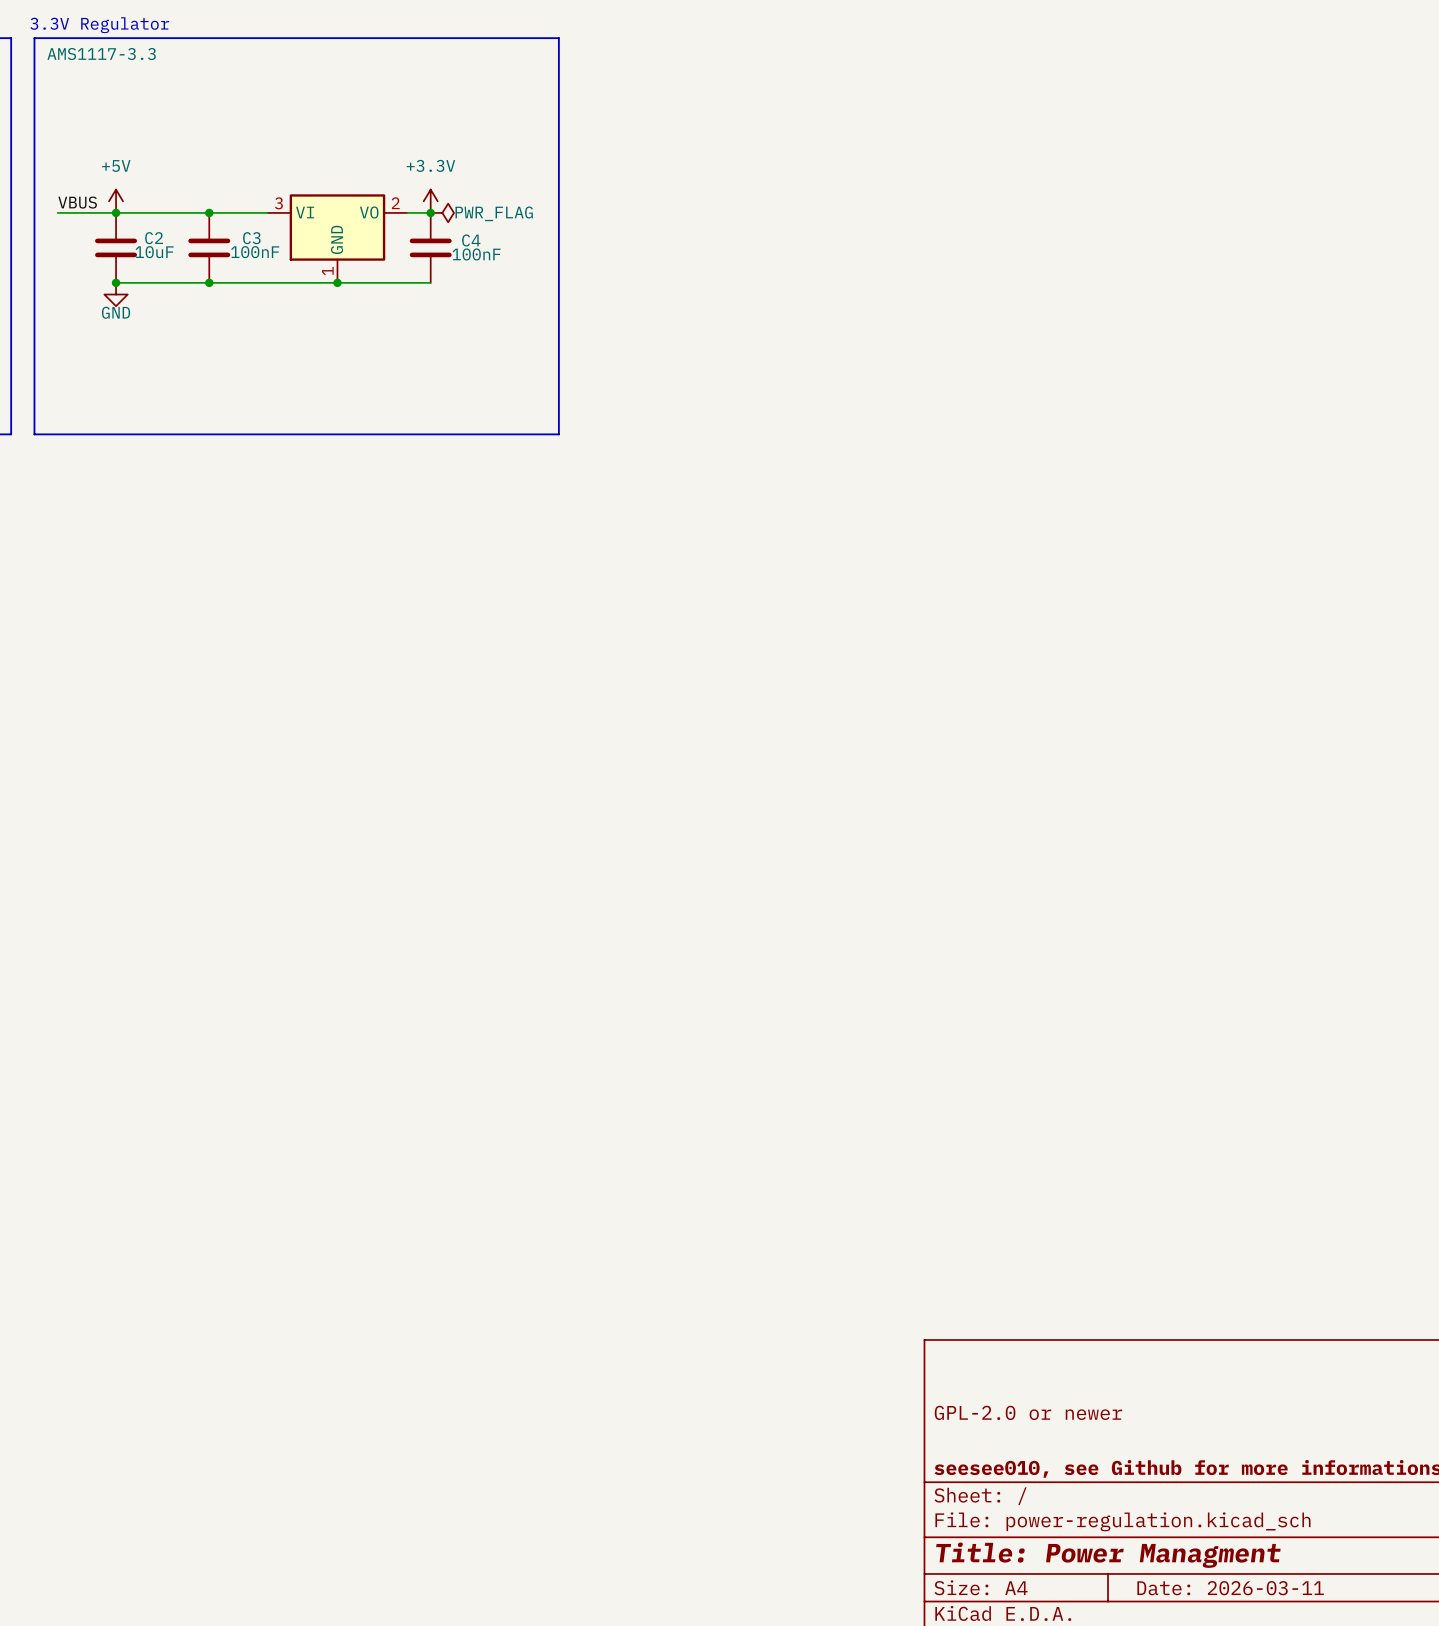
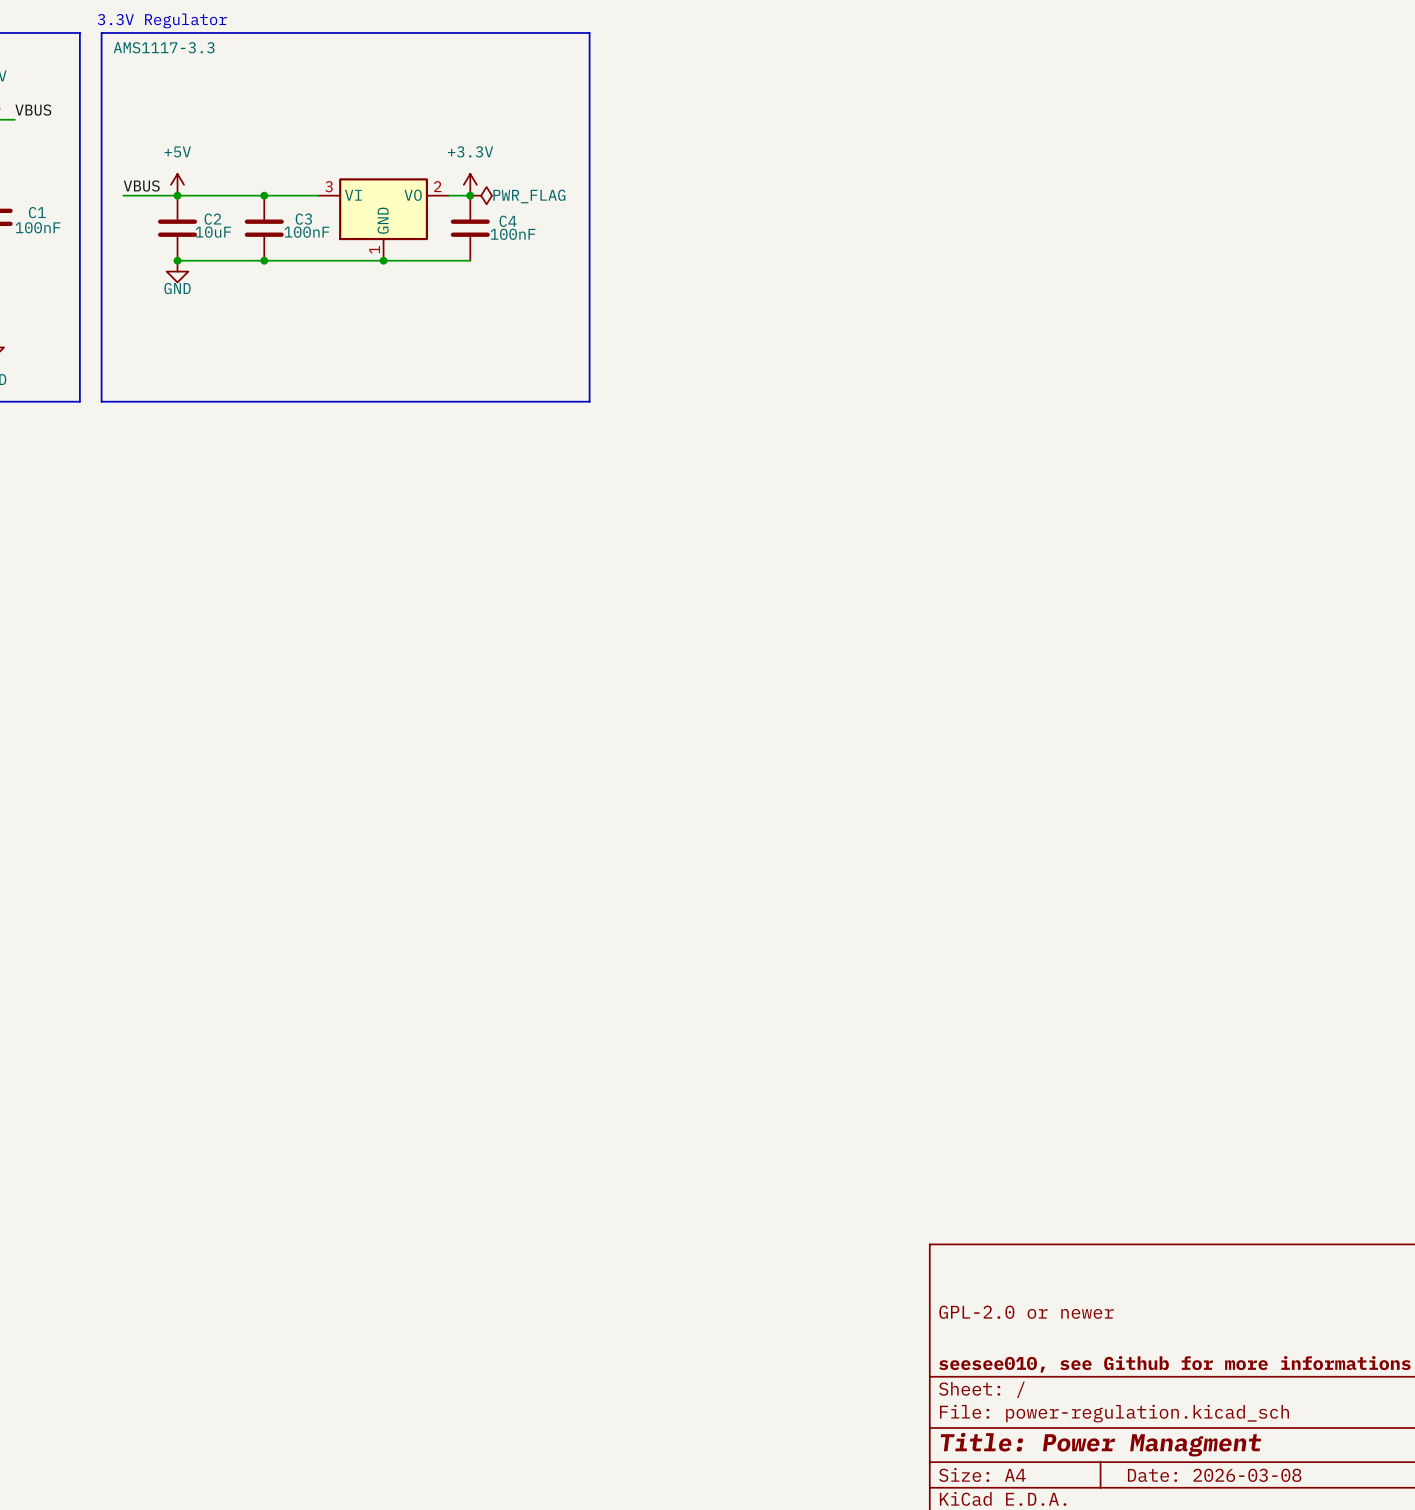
title block: Date: 2026-03-11 (1230, 1588) -> Date: 2026-03-08 (1214, 1475)

